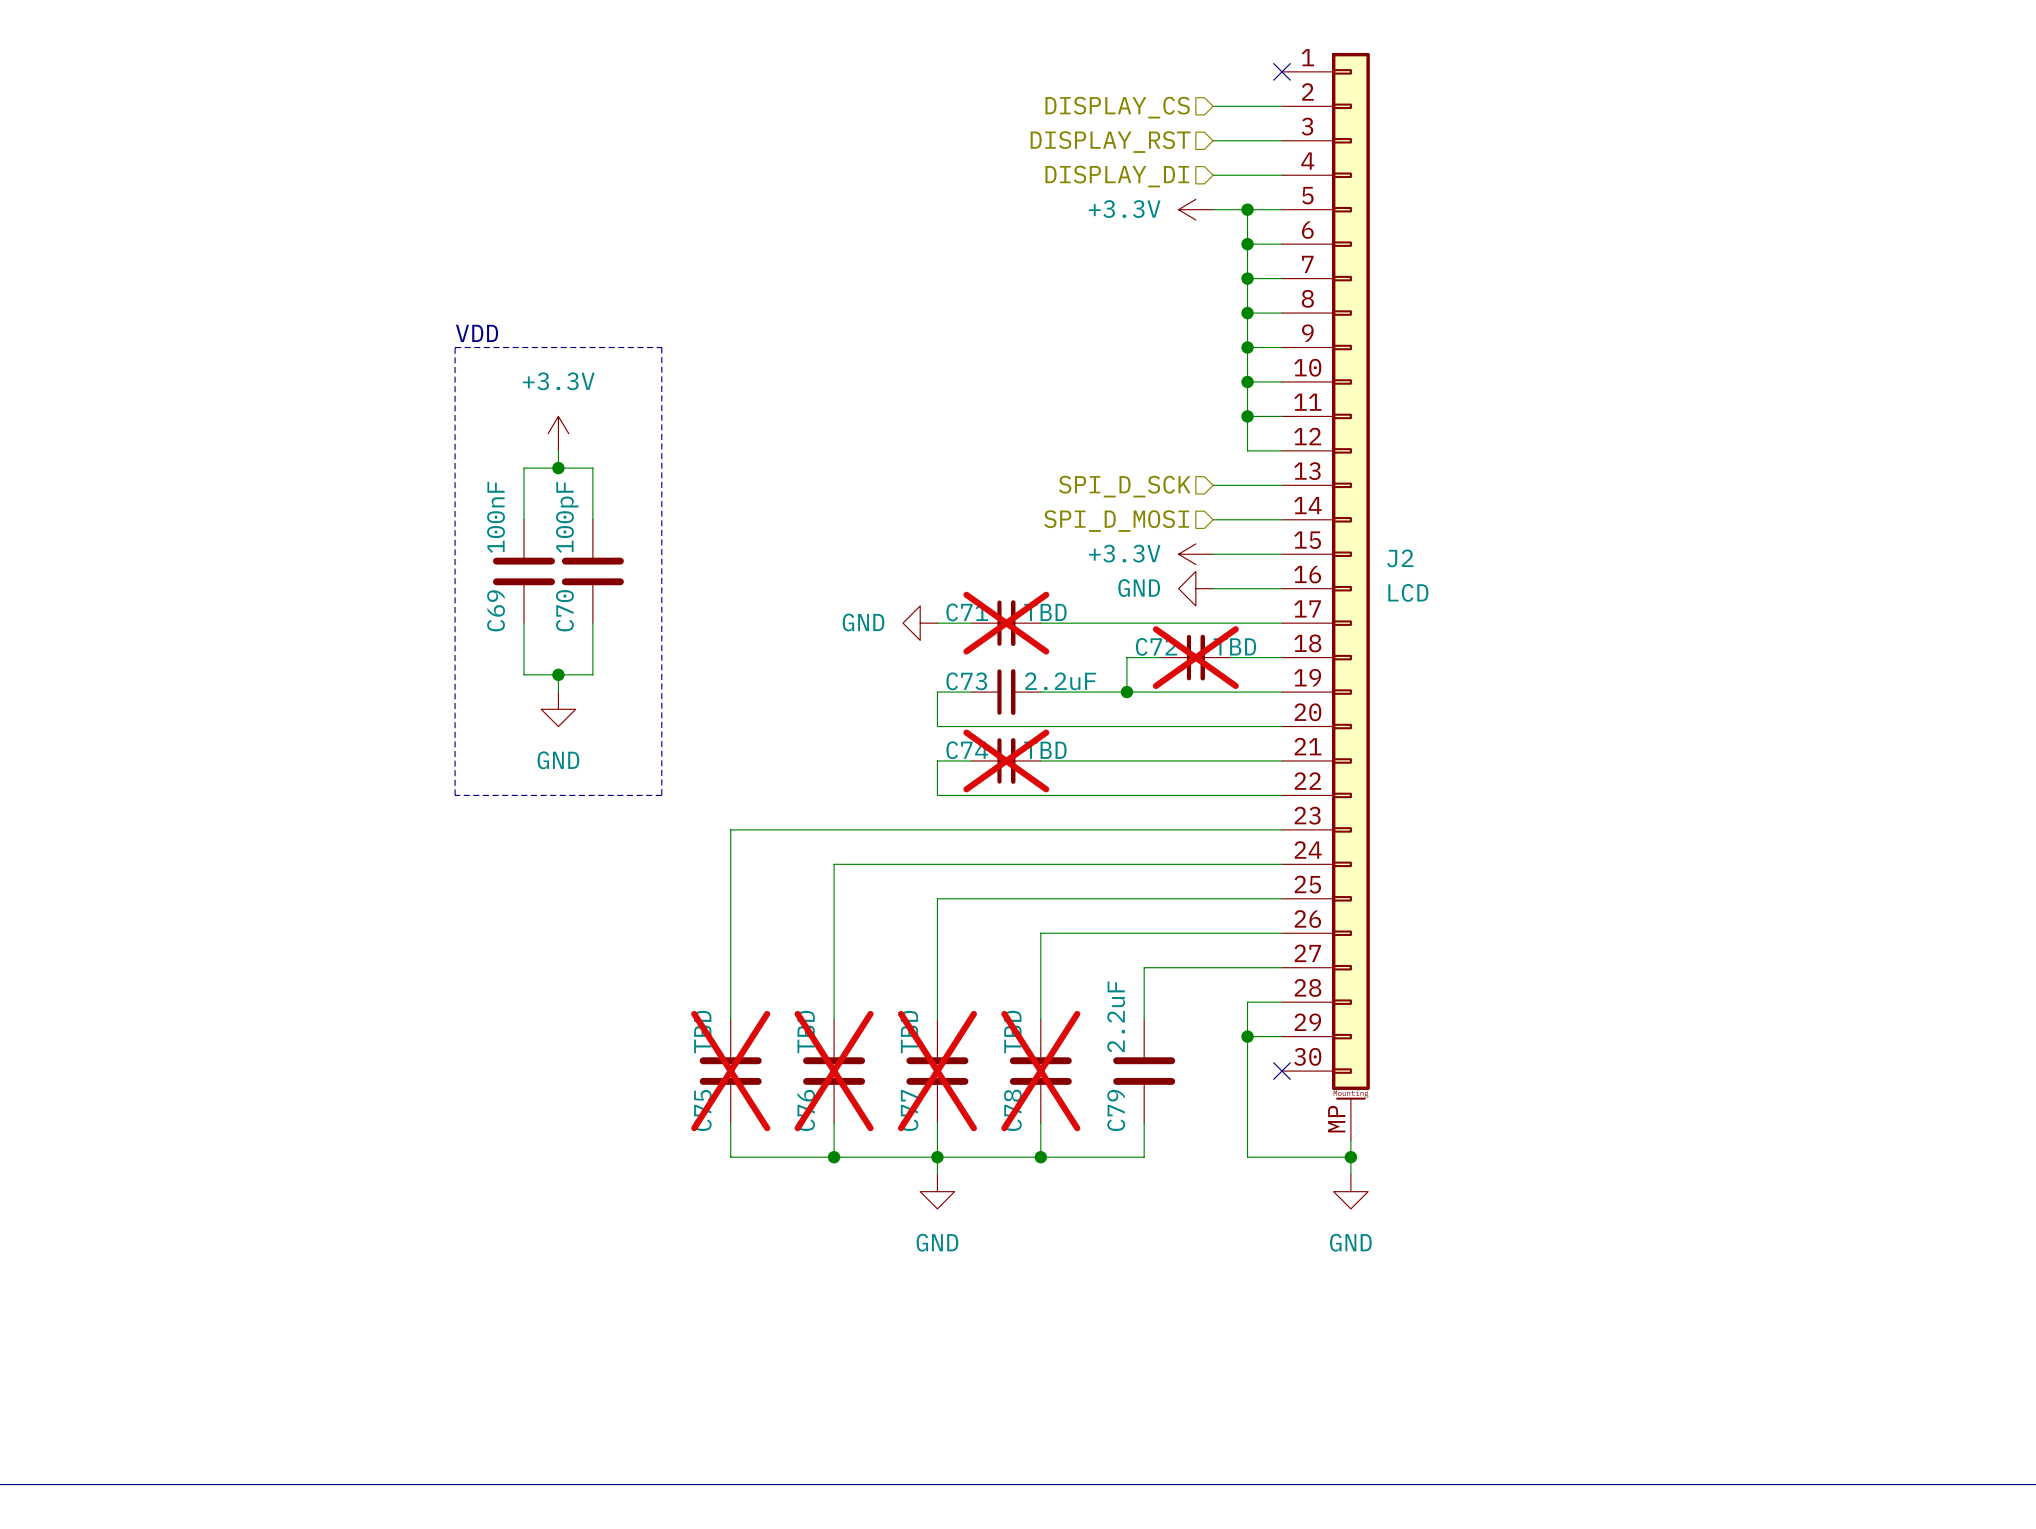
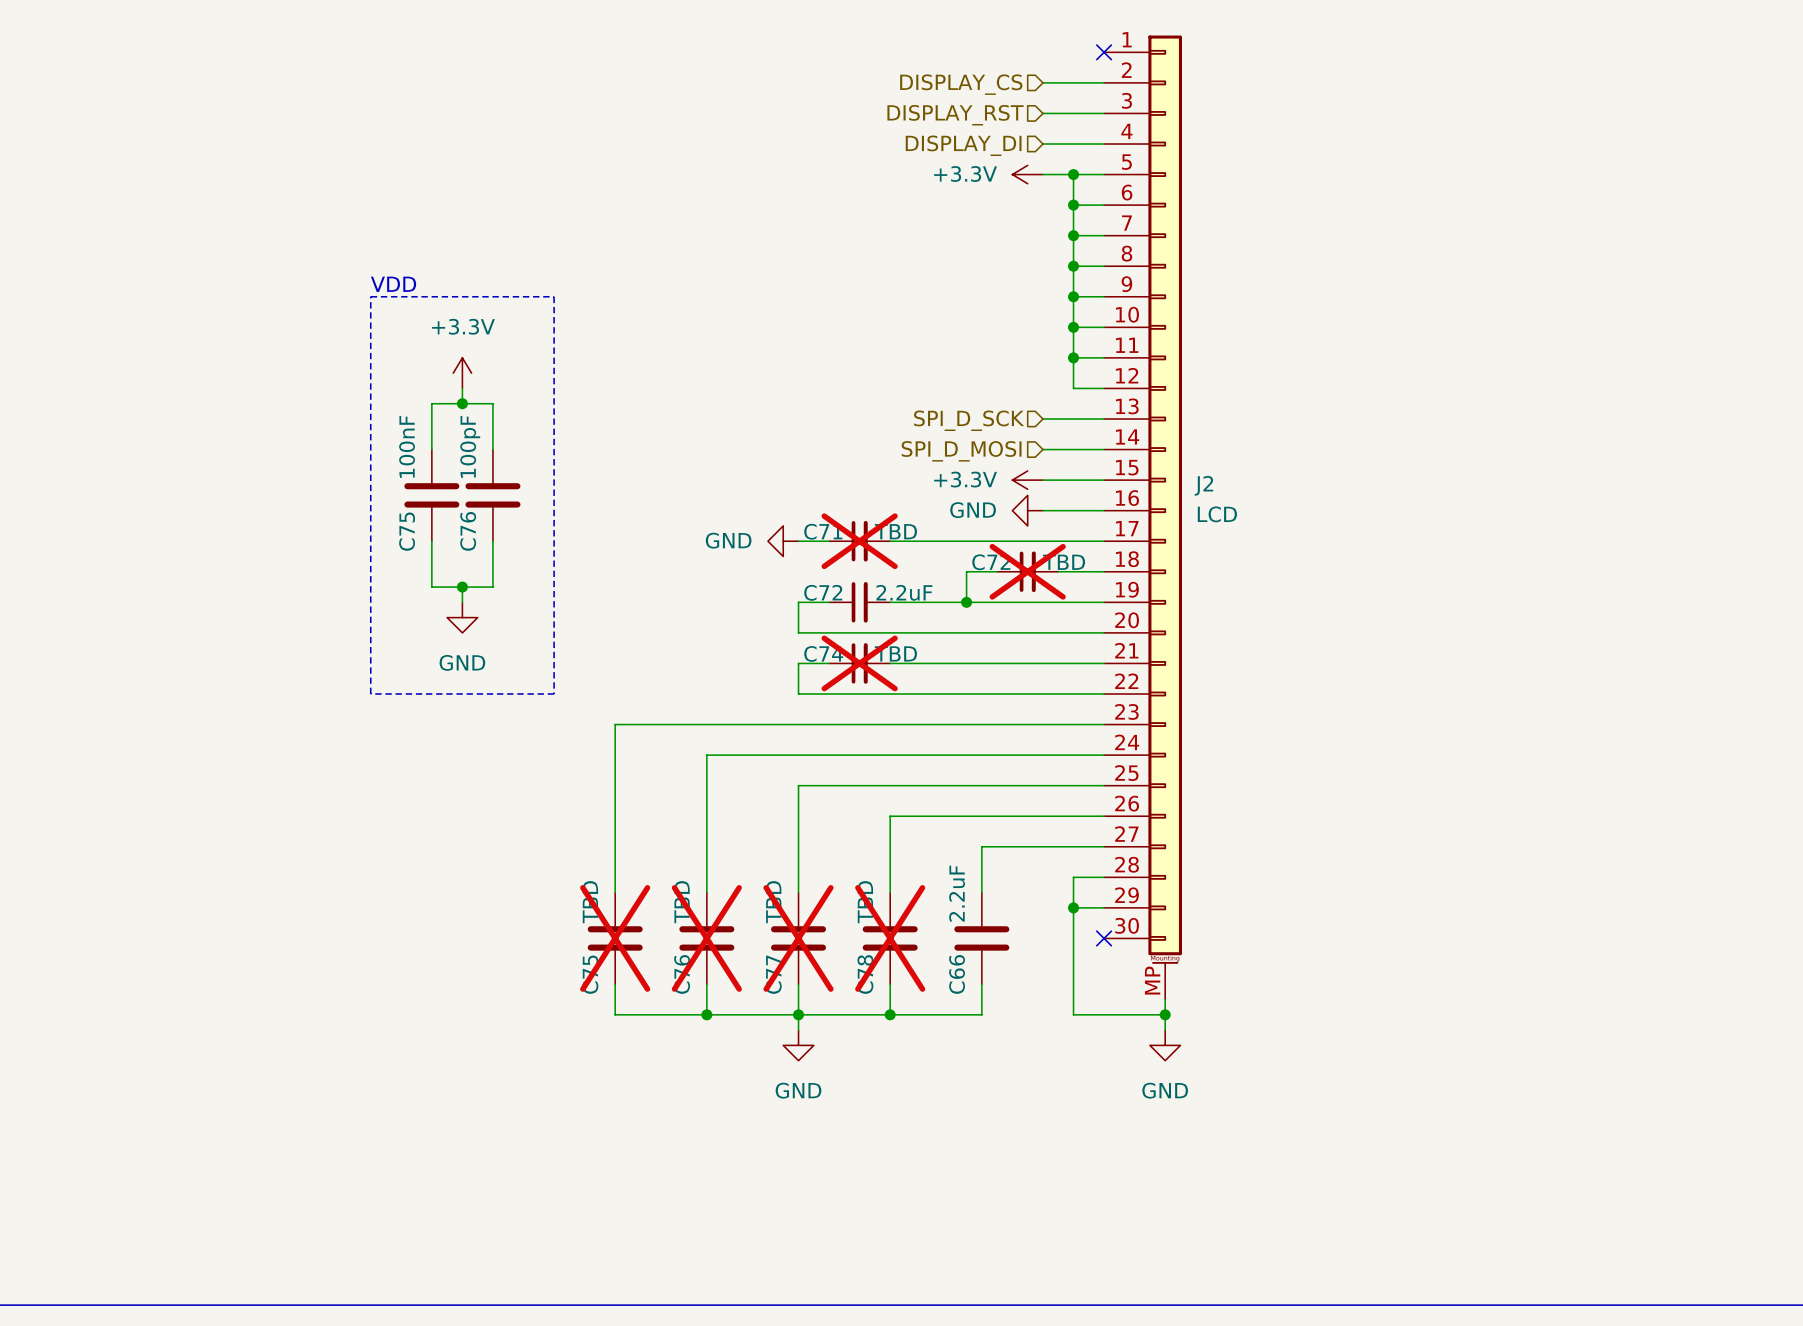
C69 name: C69 (496, 610) -> C75 (407, 531)
C70 name: C70 (564, 610) -> C76 (468, 531)
C73 name: C73 (966, 681) -> C72 (823, 592)
C79 name: C79 (1116, 1110) -> C66 (957, 974)

